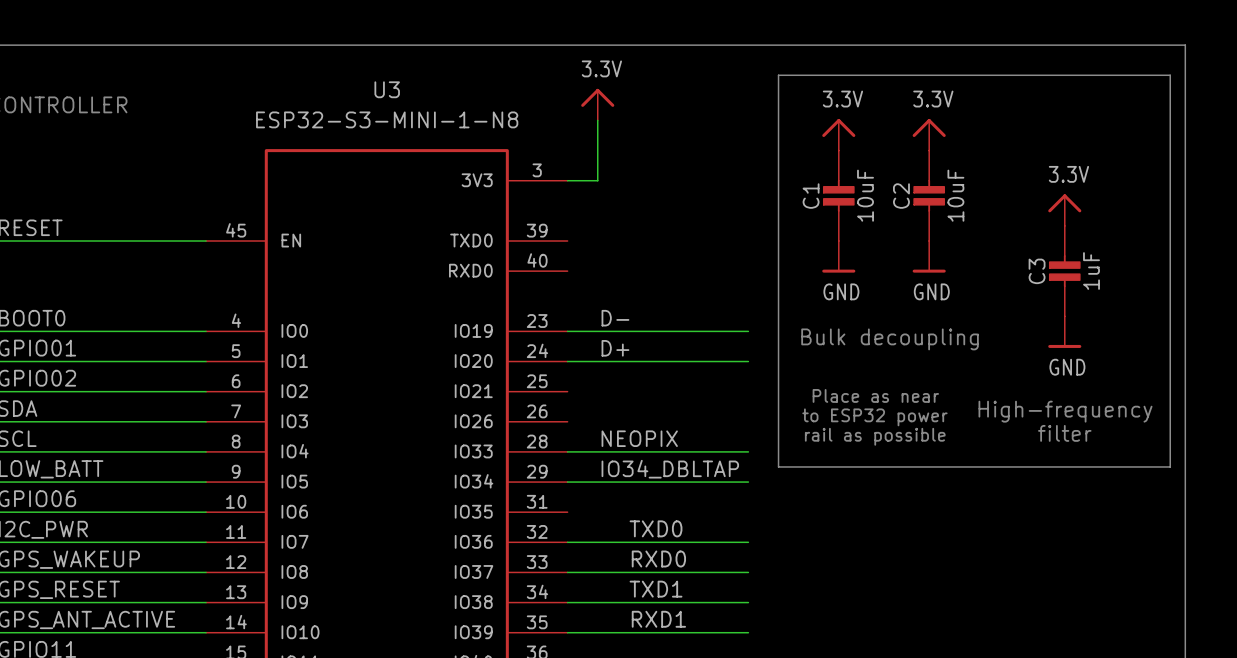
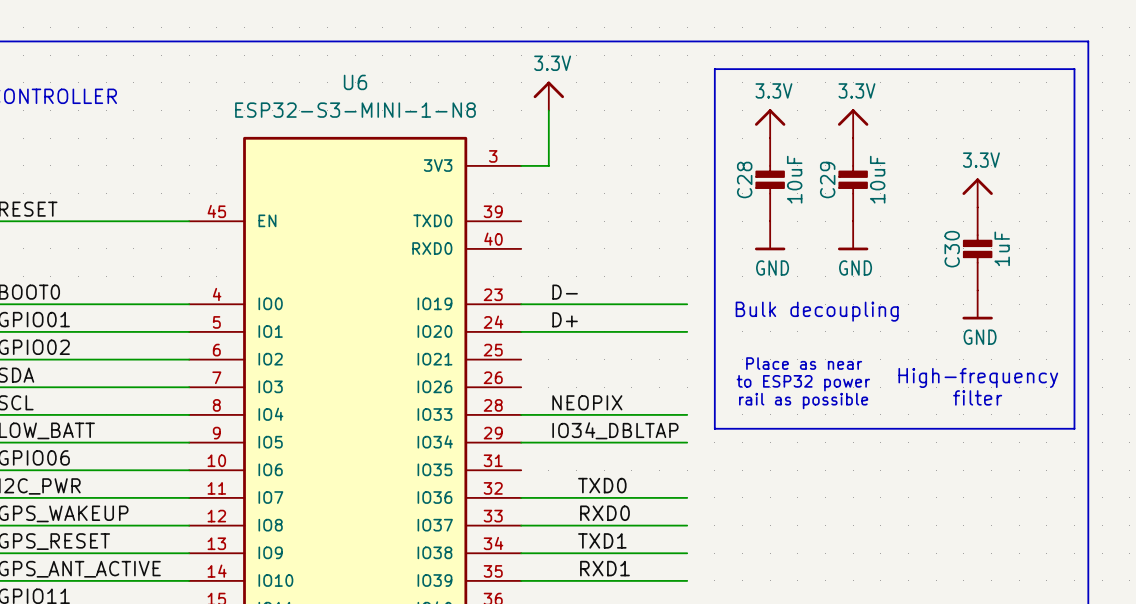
U3 name: U3 (387, 89) -> U6 (355, 82)
C1 name: C1 (811, 196) -> C28 (744, 179)
C2 name: C2 (901, 196) -> C29 (827, 179)
C3 name: C3 (1037, 271) -> C30 (952, 249)

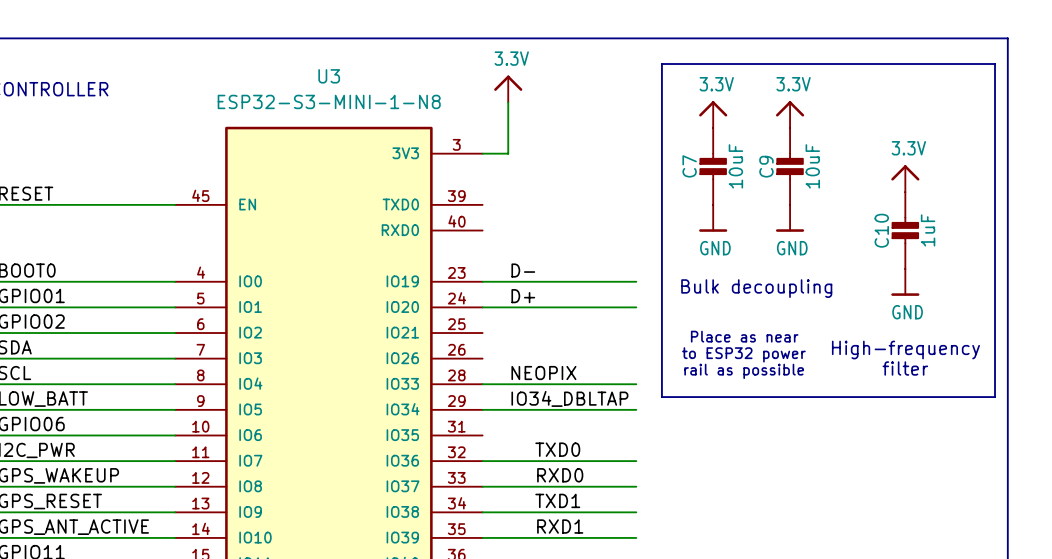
U6 name: U6 (355, 82) -> U3 (329, 76)
C28 name: C28 (744, 179) -> C7 (689, 166)
C29 name: C29 (827, 179) -> C9 (766, 166)
C30 name: C30 (952, 249) -> C10 (881, 230)

